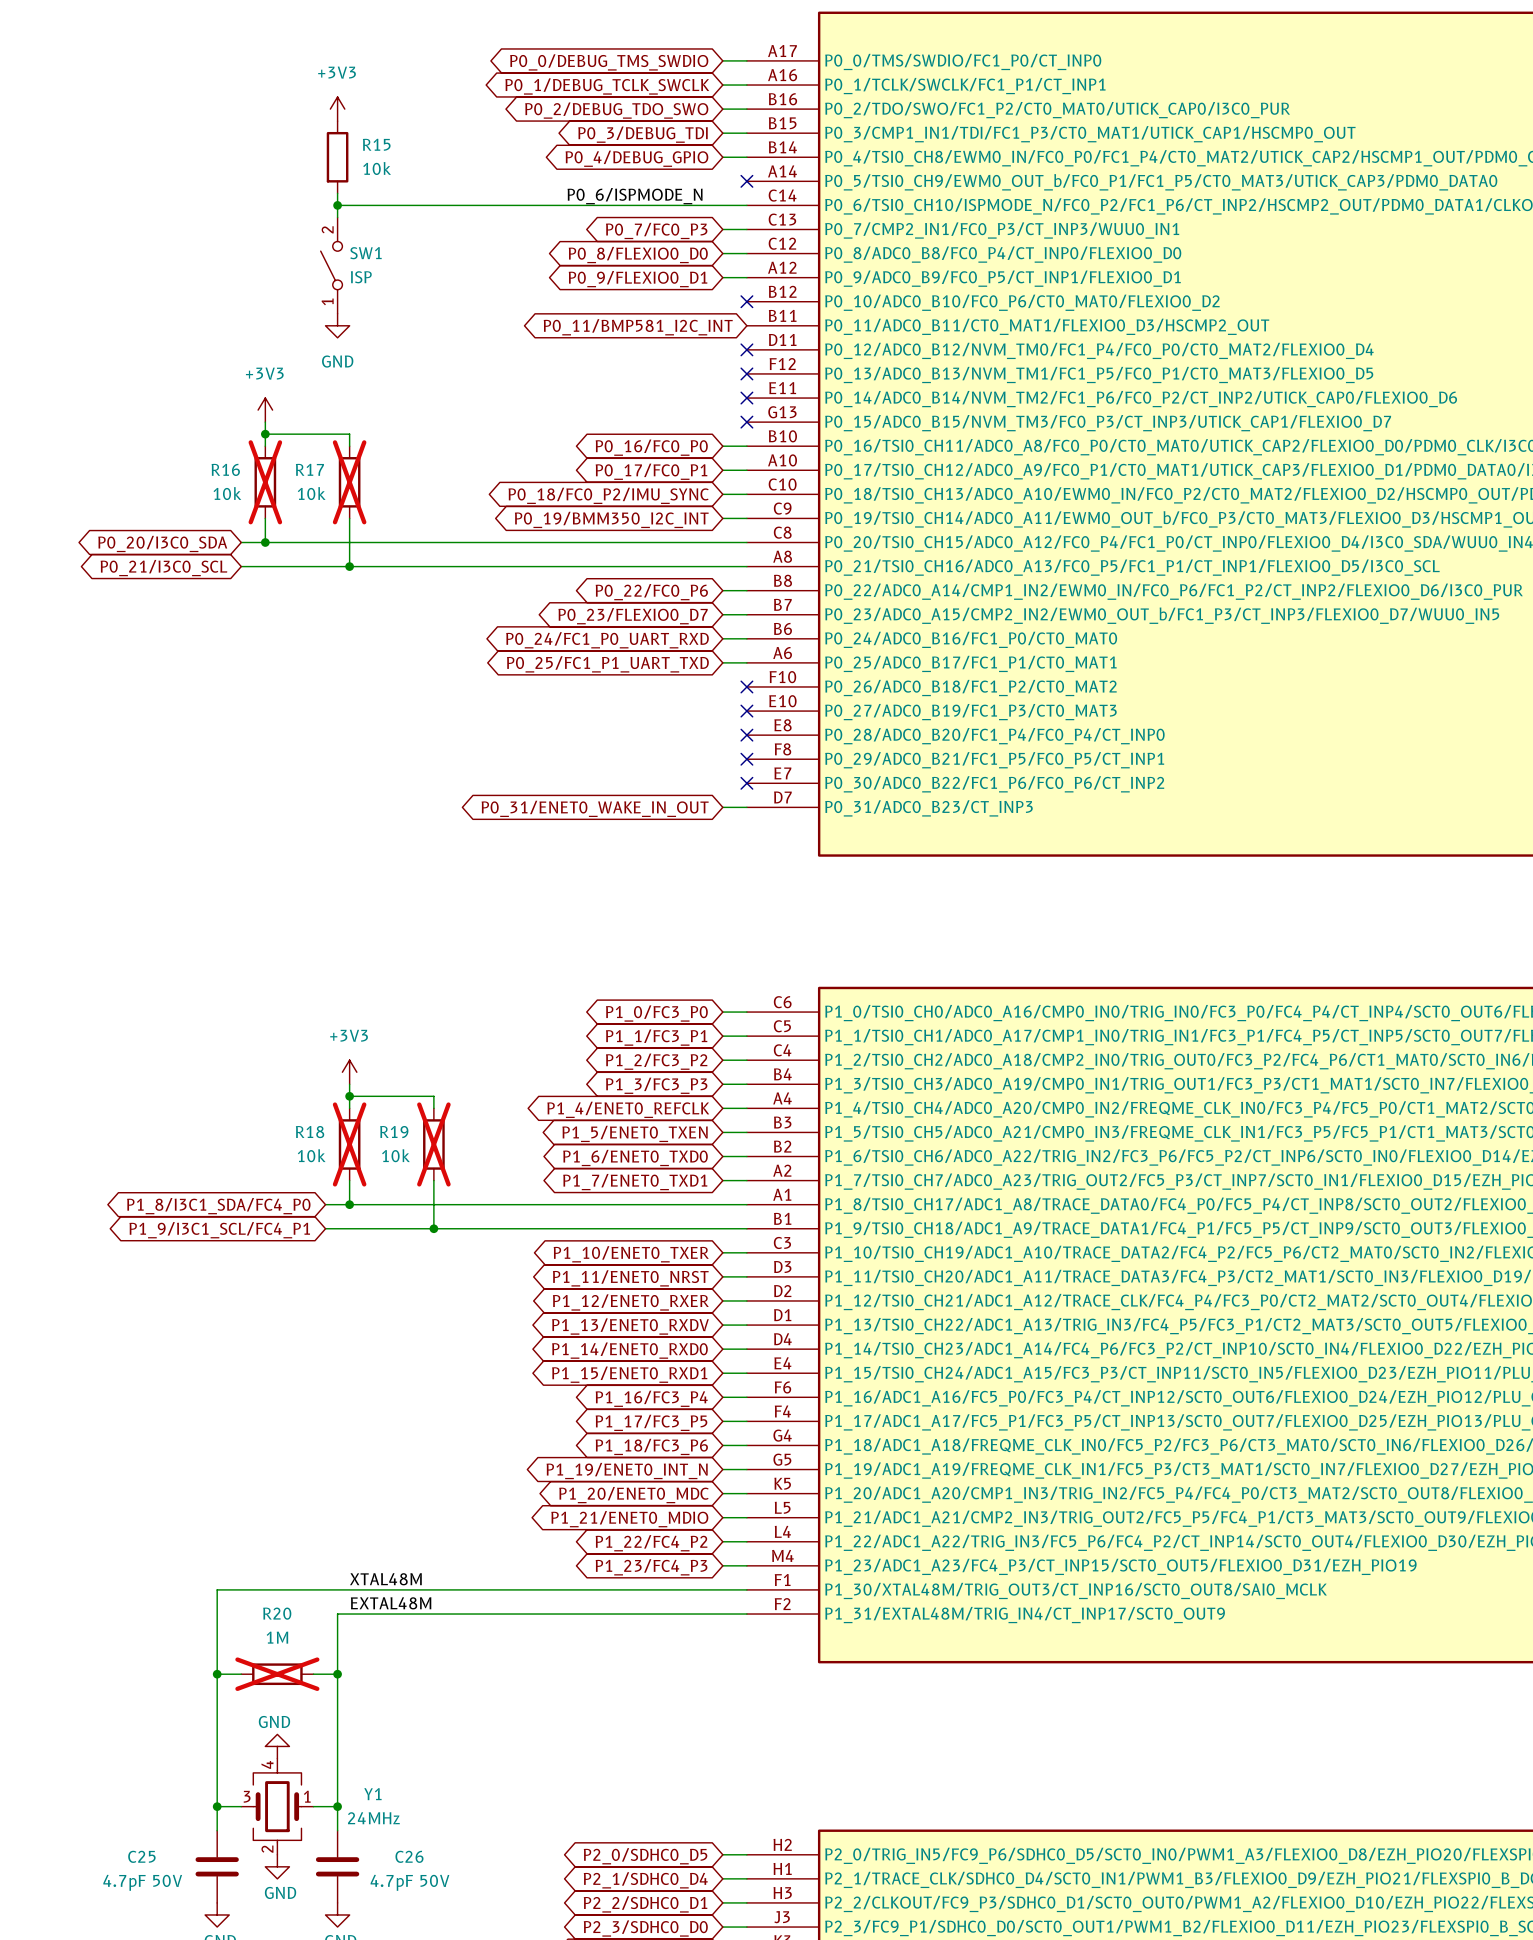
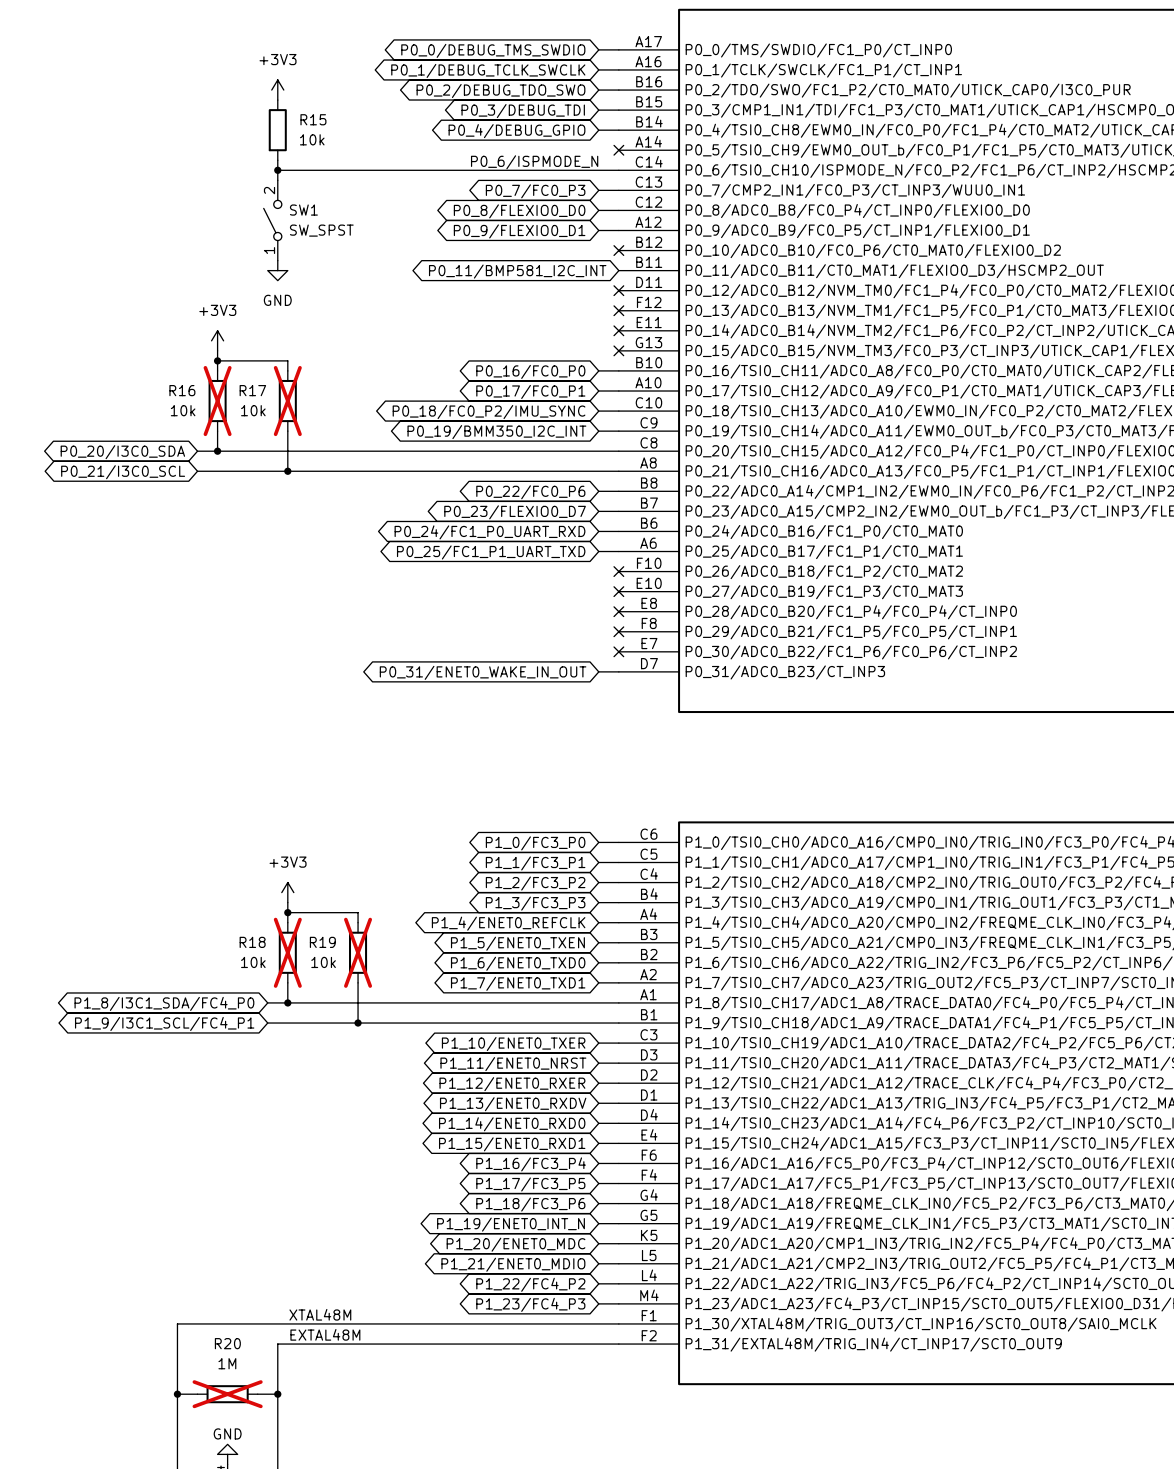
SW1 value: ISP (361, 277) -> SW_SPST (321, 230)

